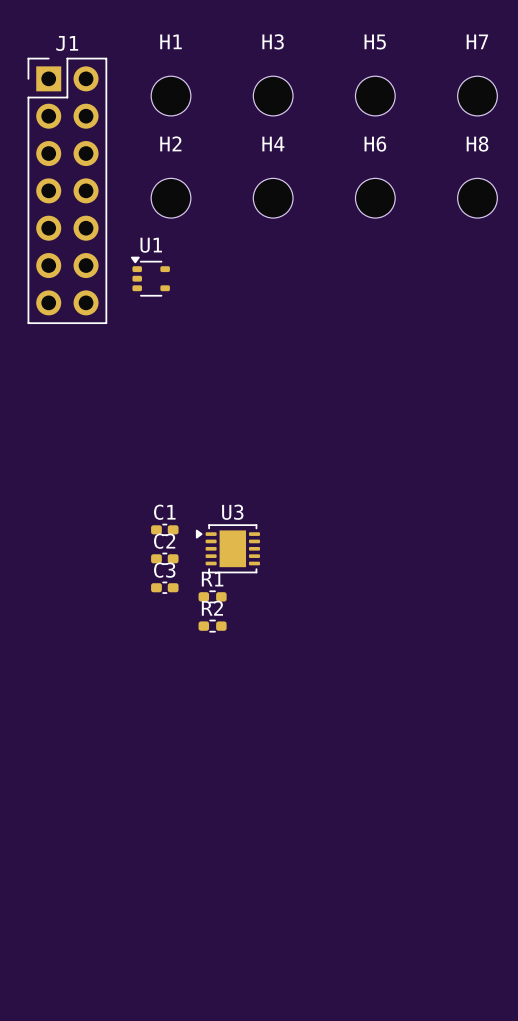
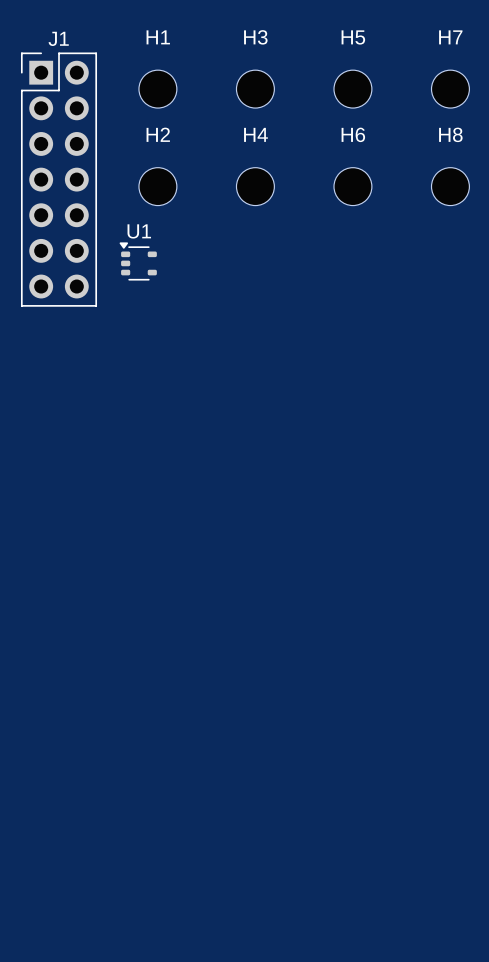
C1: (164, 529) -> none
U3: (227, 548) -> none
C2: (164, 558) -> none
C3: (164, 587) -> none
R1: (212, 596) -> none
R2: (212, 626) -> none

